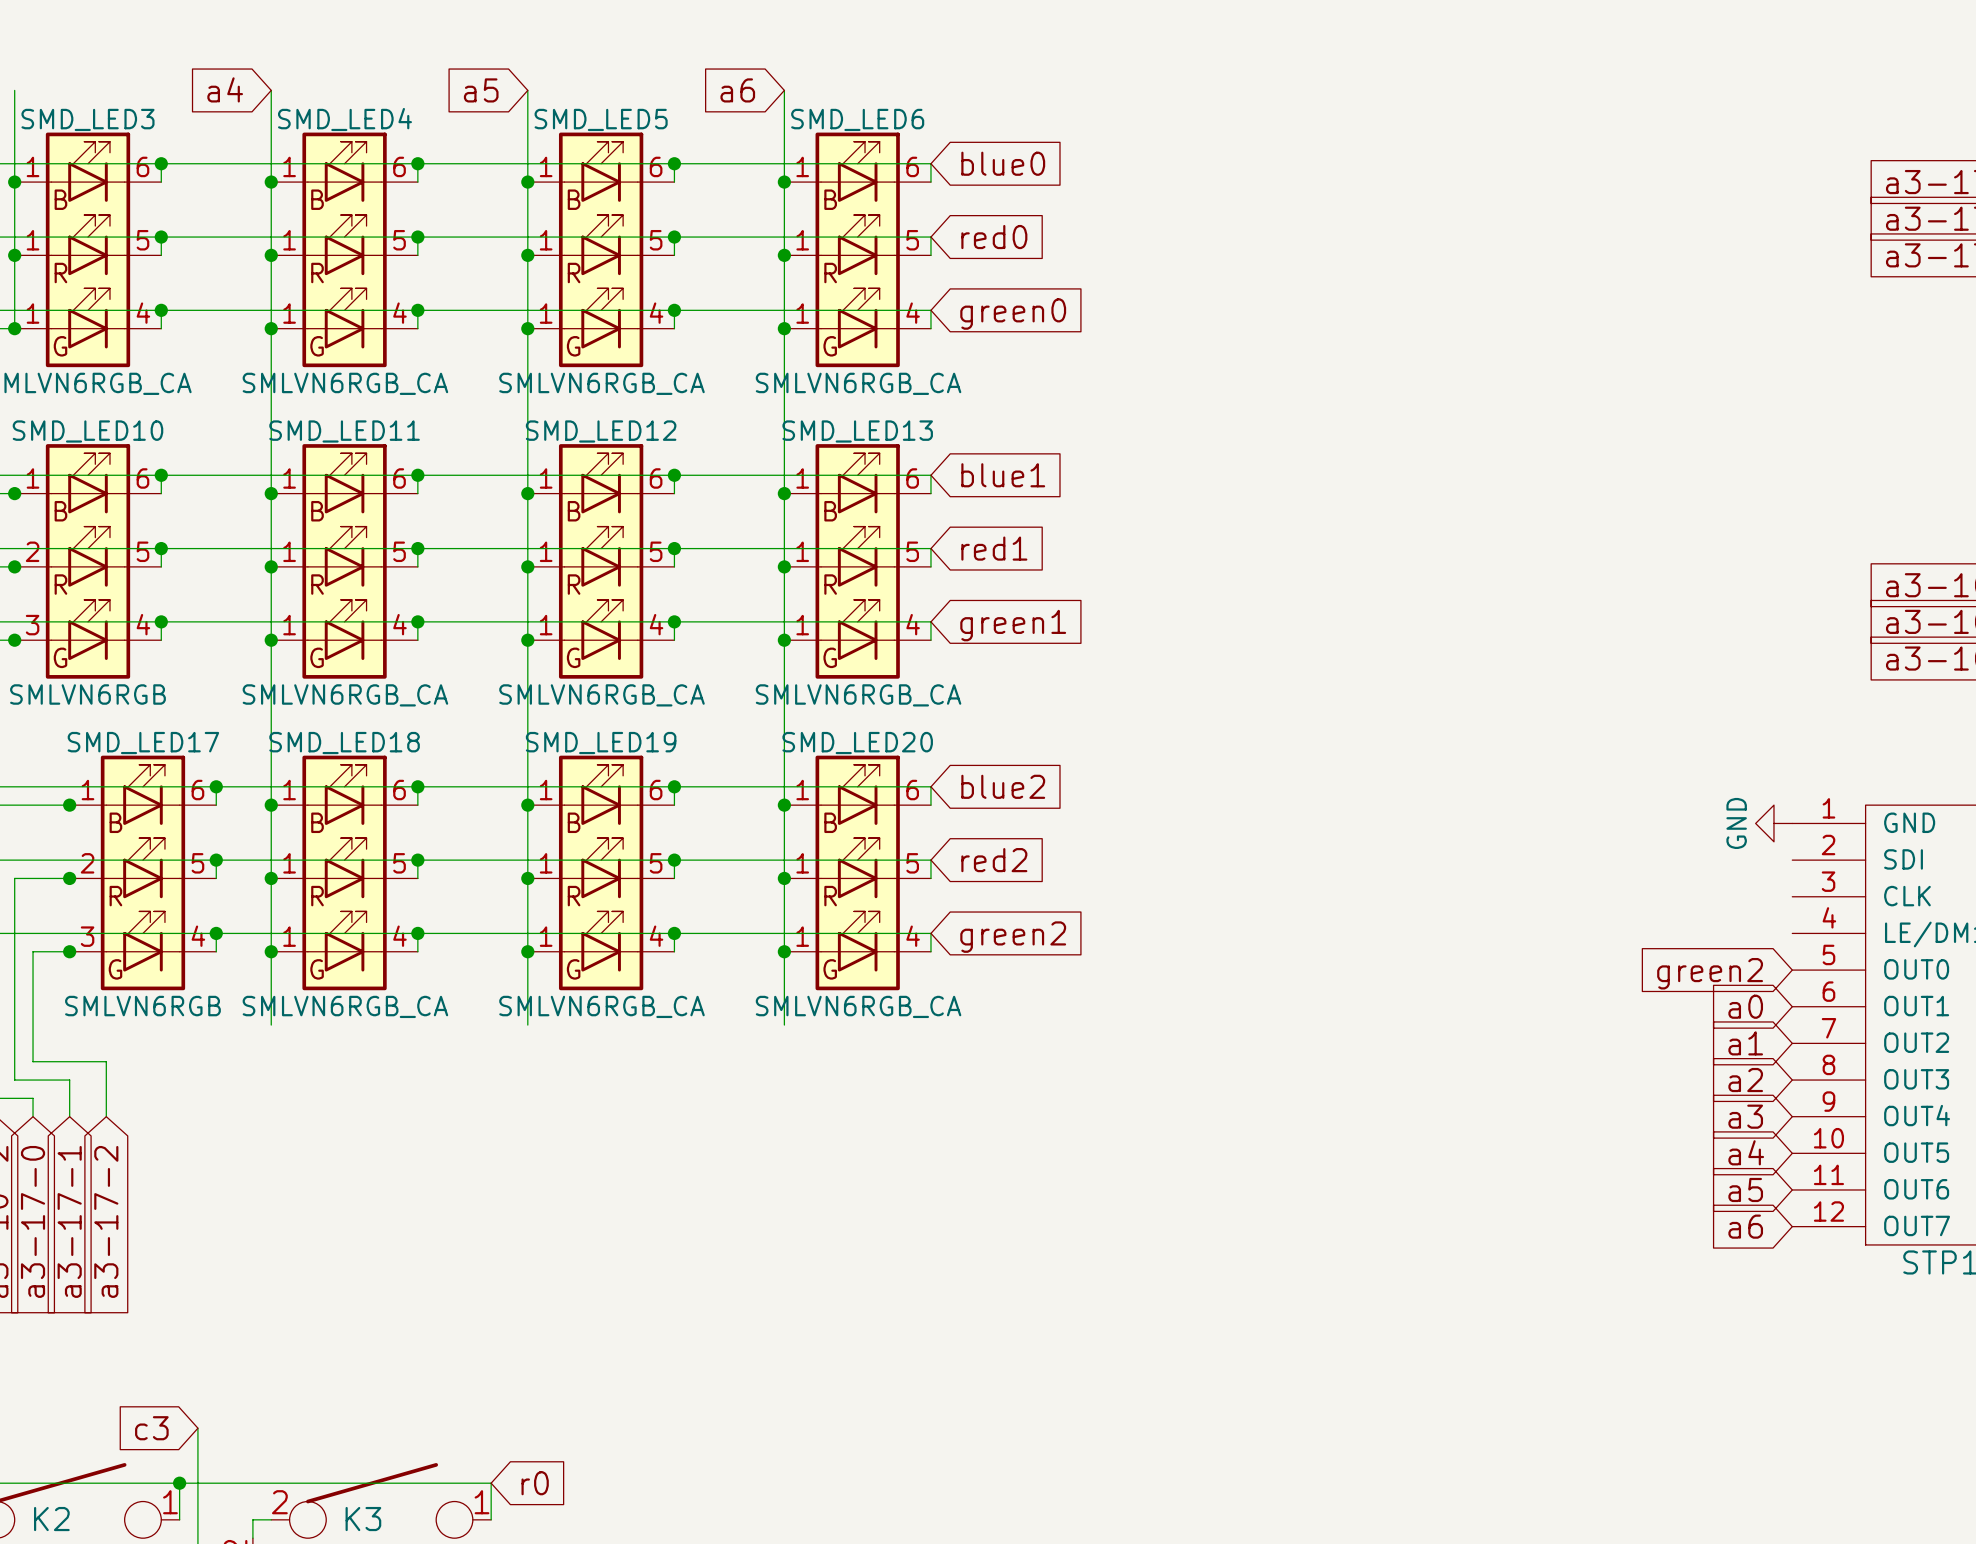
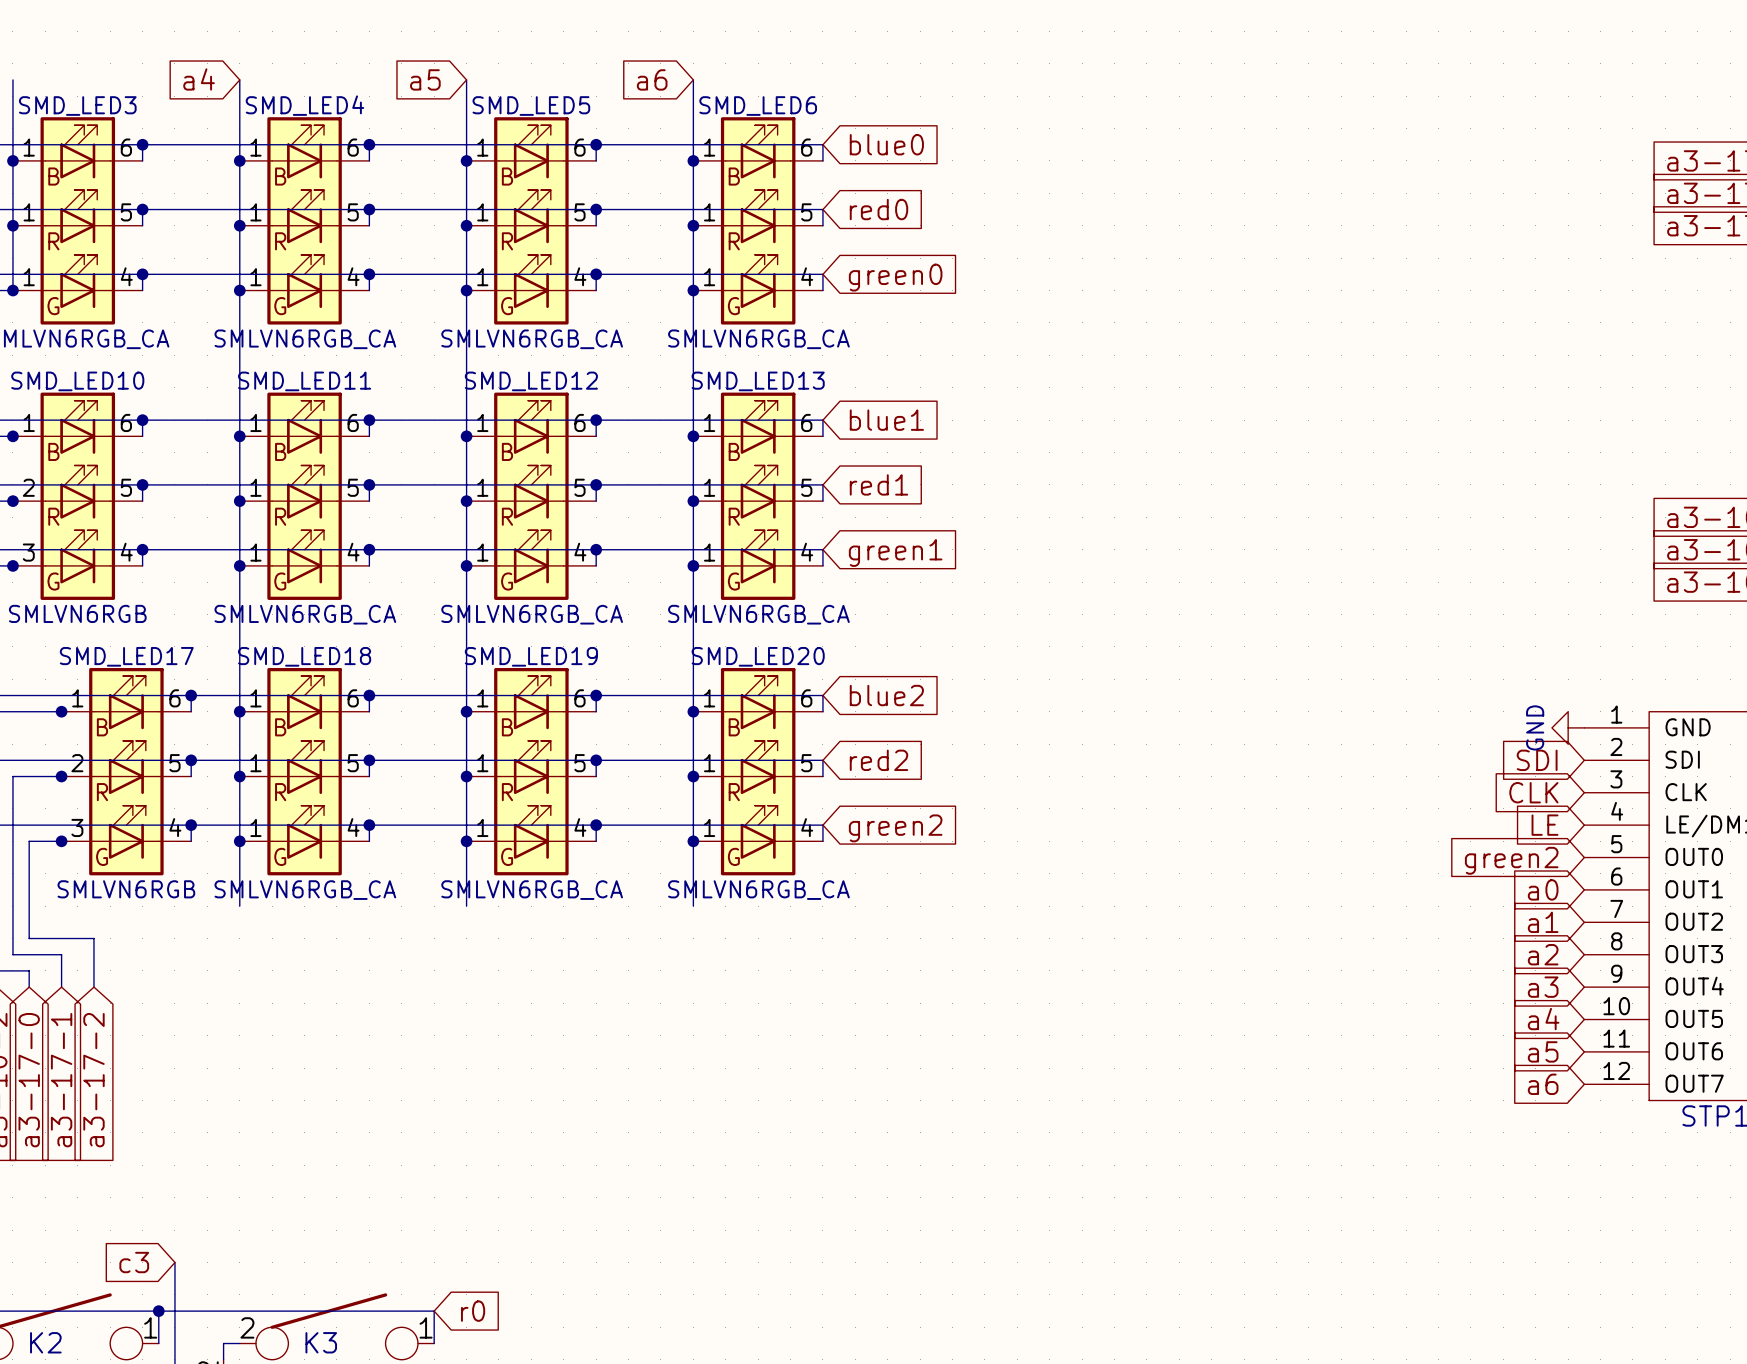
global label: none -> SDI (1537, 760)
global label: none -> CLK (1533, 792)
global label: none -> LE (1545, 825)

